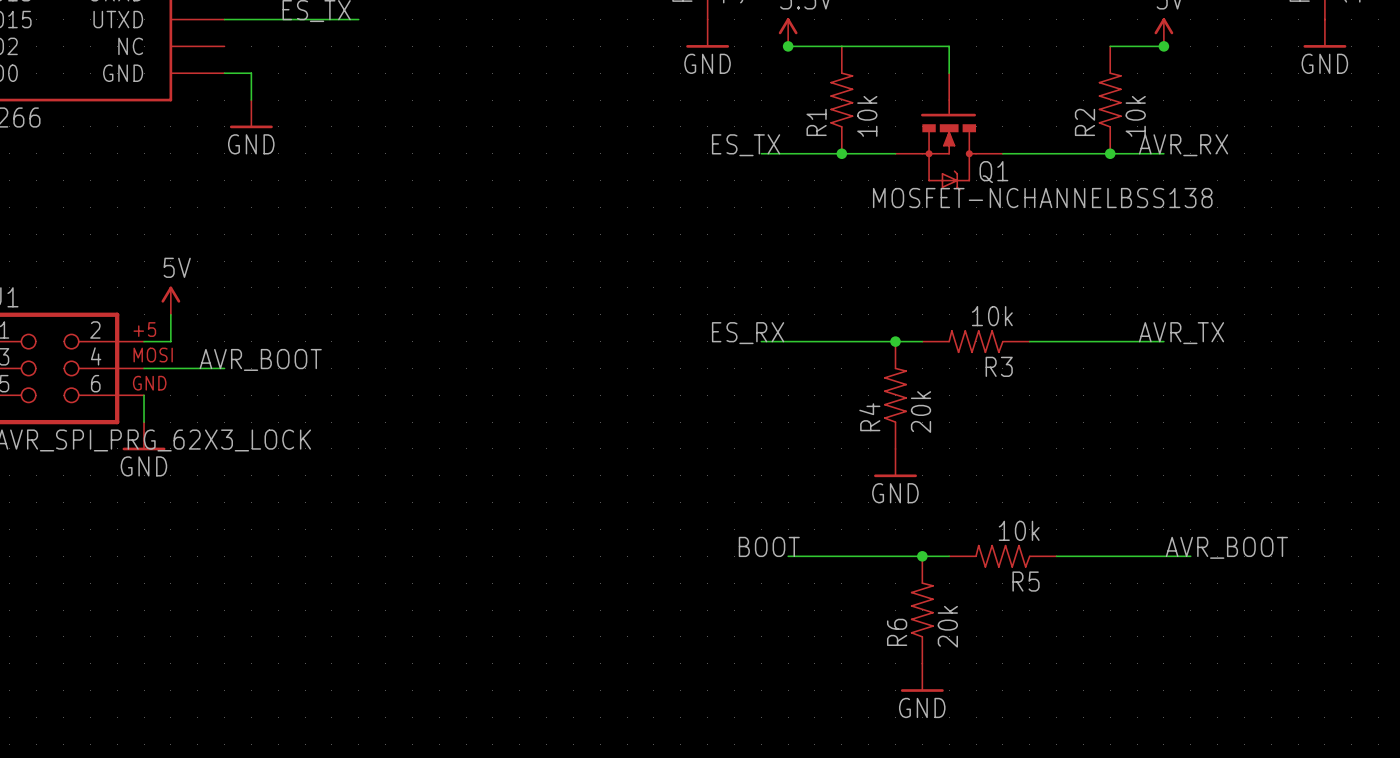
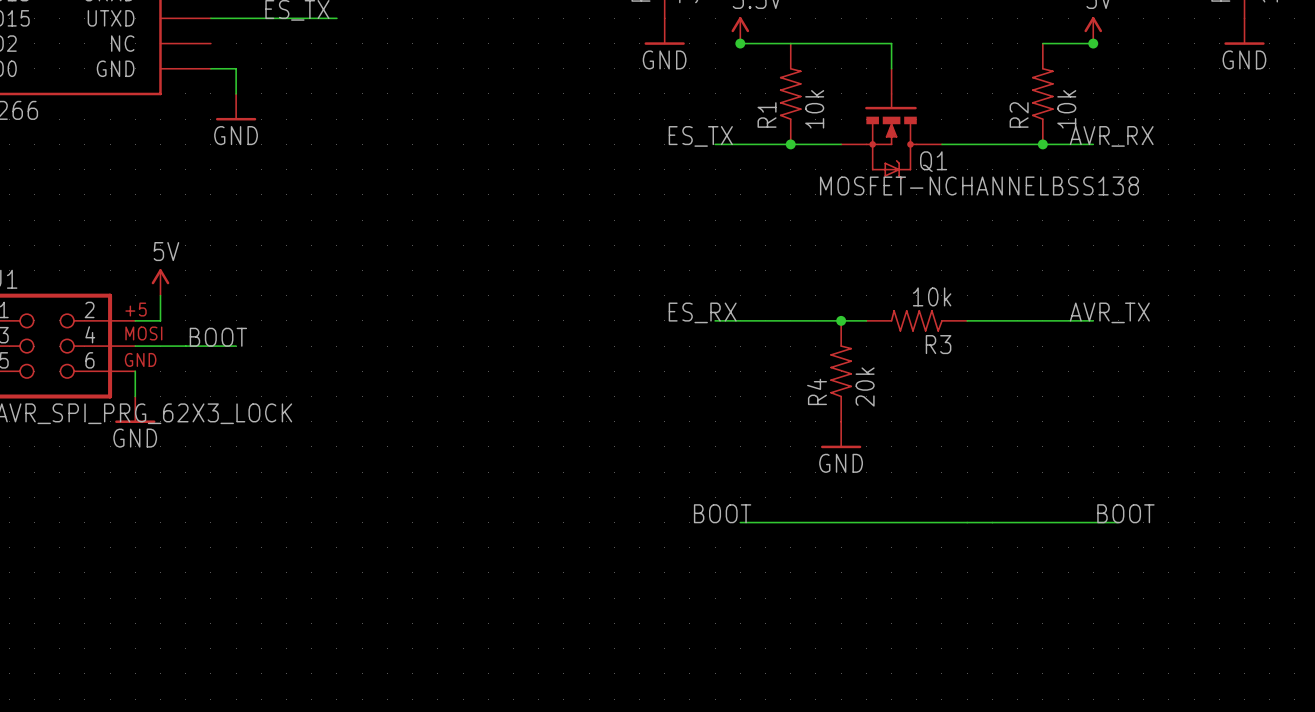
label: AVR_BOOT (260, 359) -> BOOT (218, 337)
wire: none -> (210, 346) (236, 346)
label: AVR_BOOT (1226, 547) -> BOOT (1125, 513)
junction: (922, 556) -> none
R5: 10k (1002, 556) -> none
R6: 20k (922, 610) -> none
power symbol: GND (922, 677) -> none

